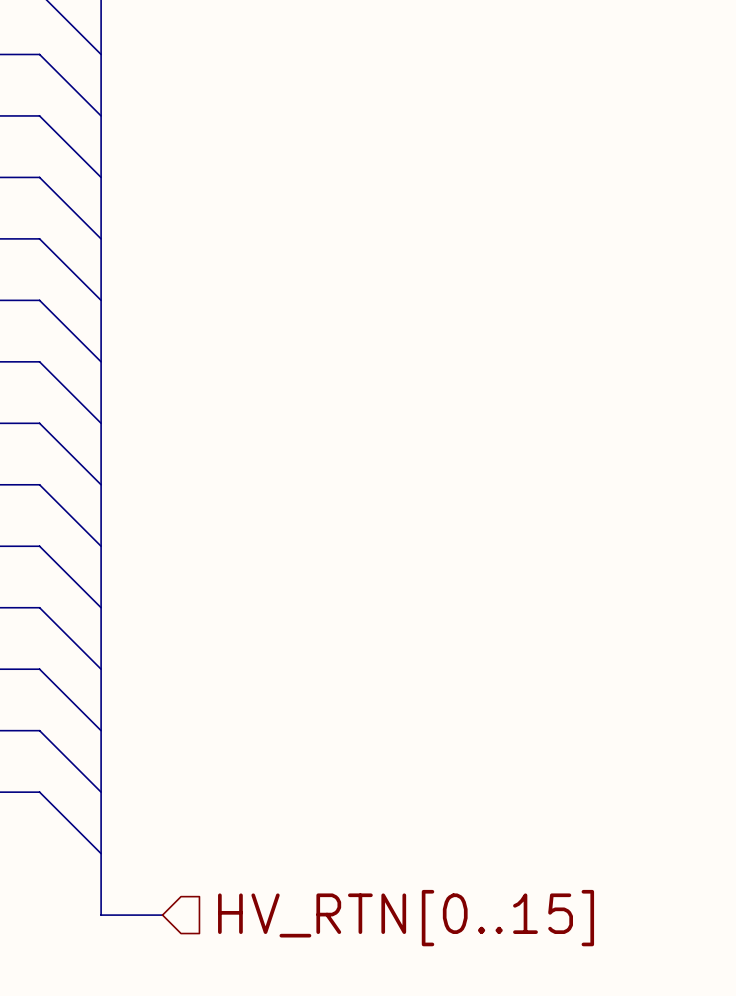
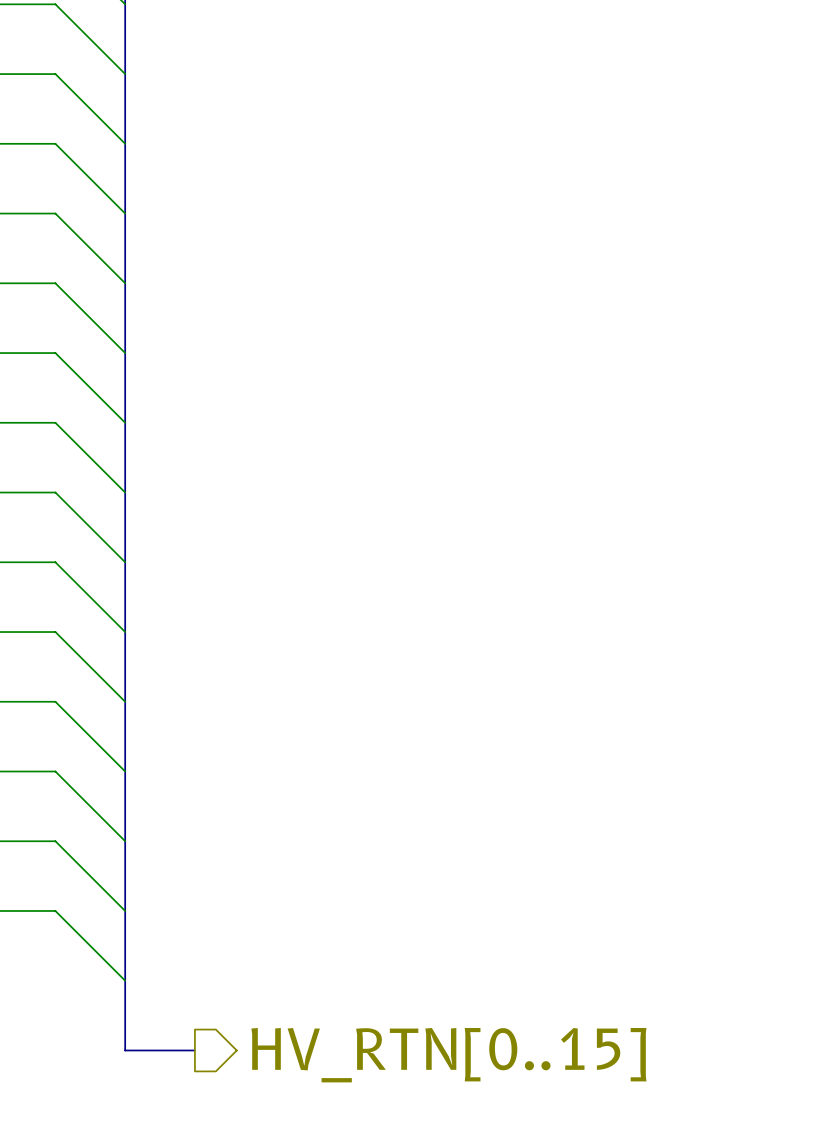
hierarchical label shape: input (406, 918) -> output (448, 1055)

